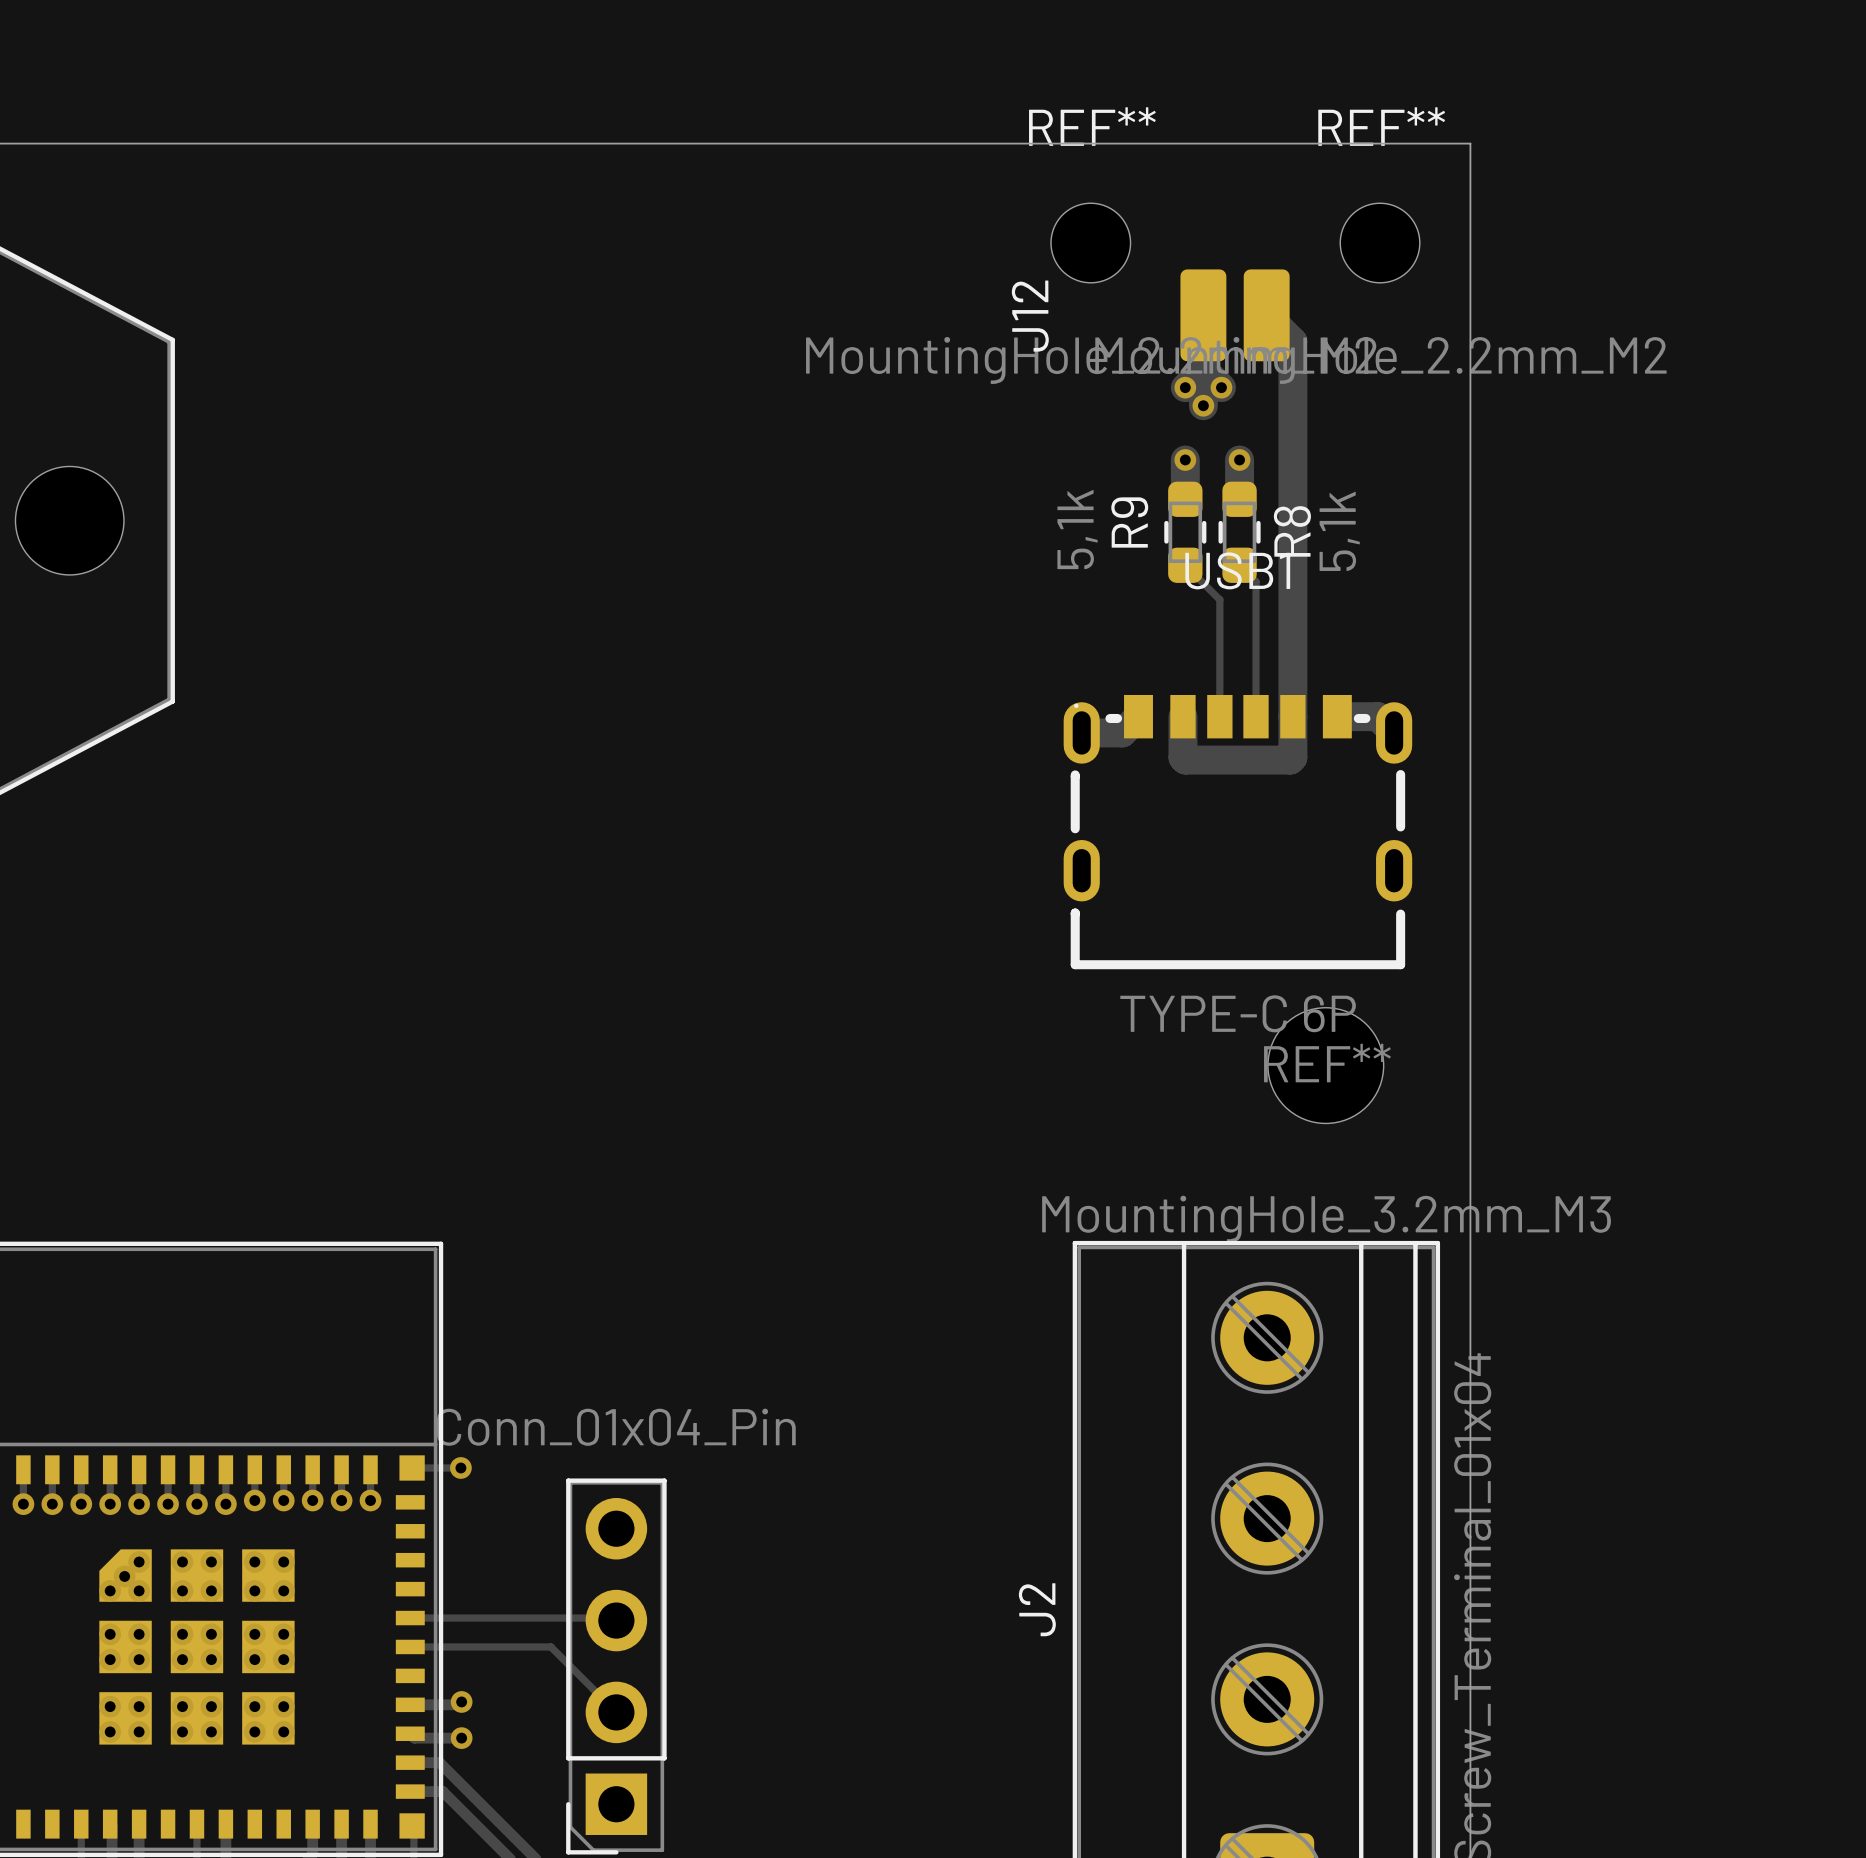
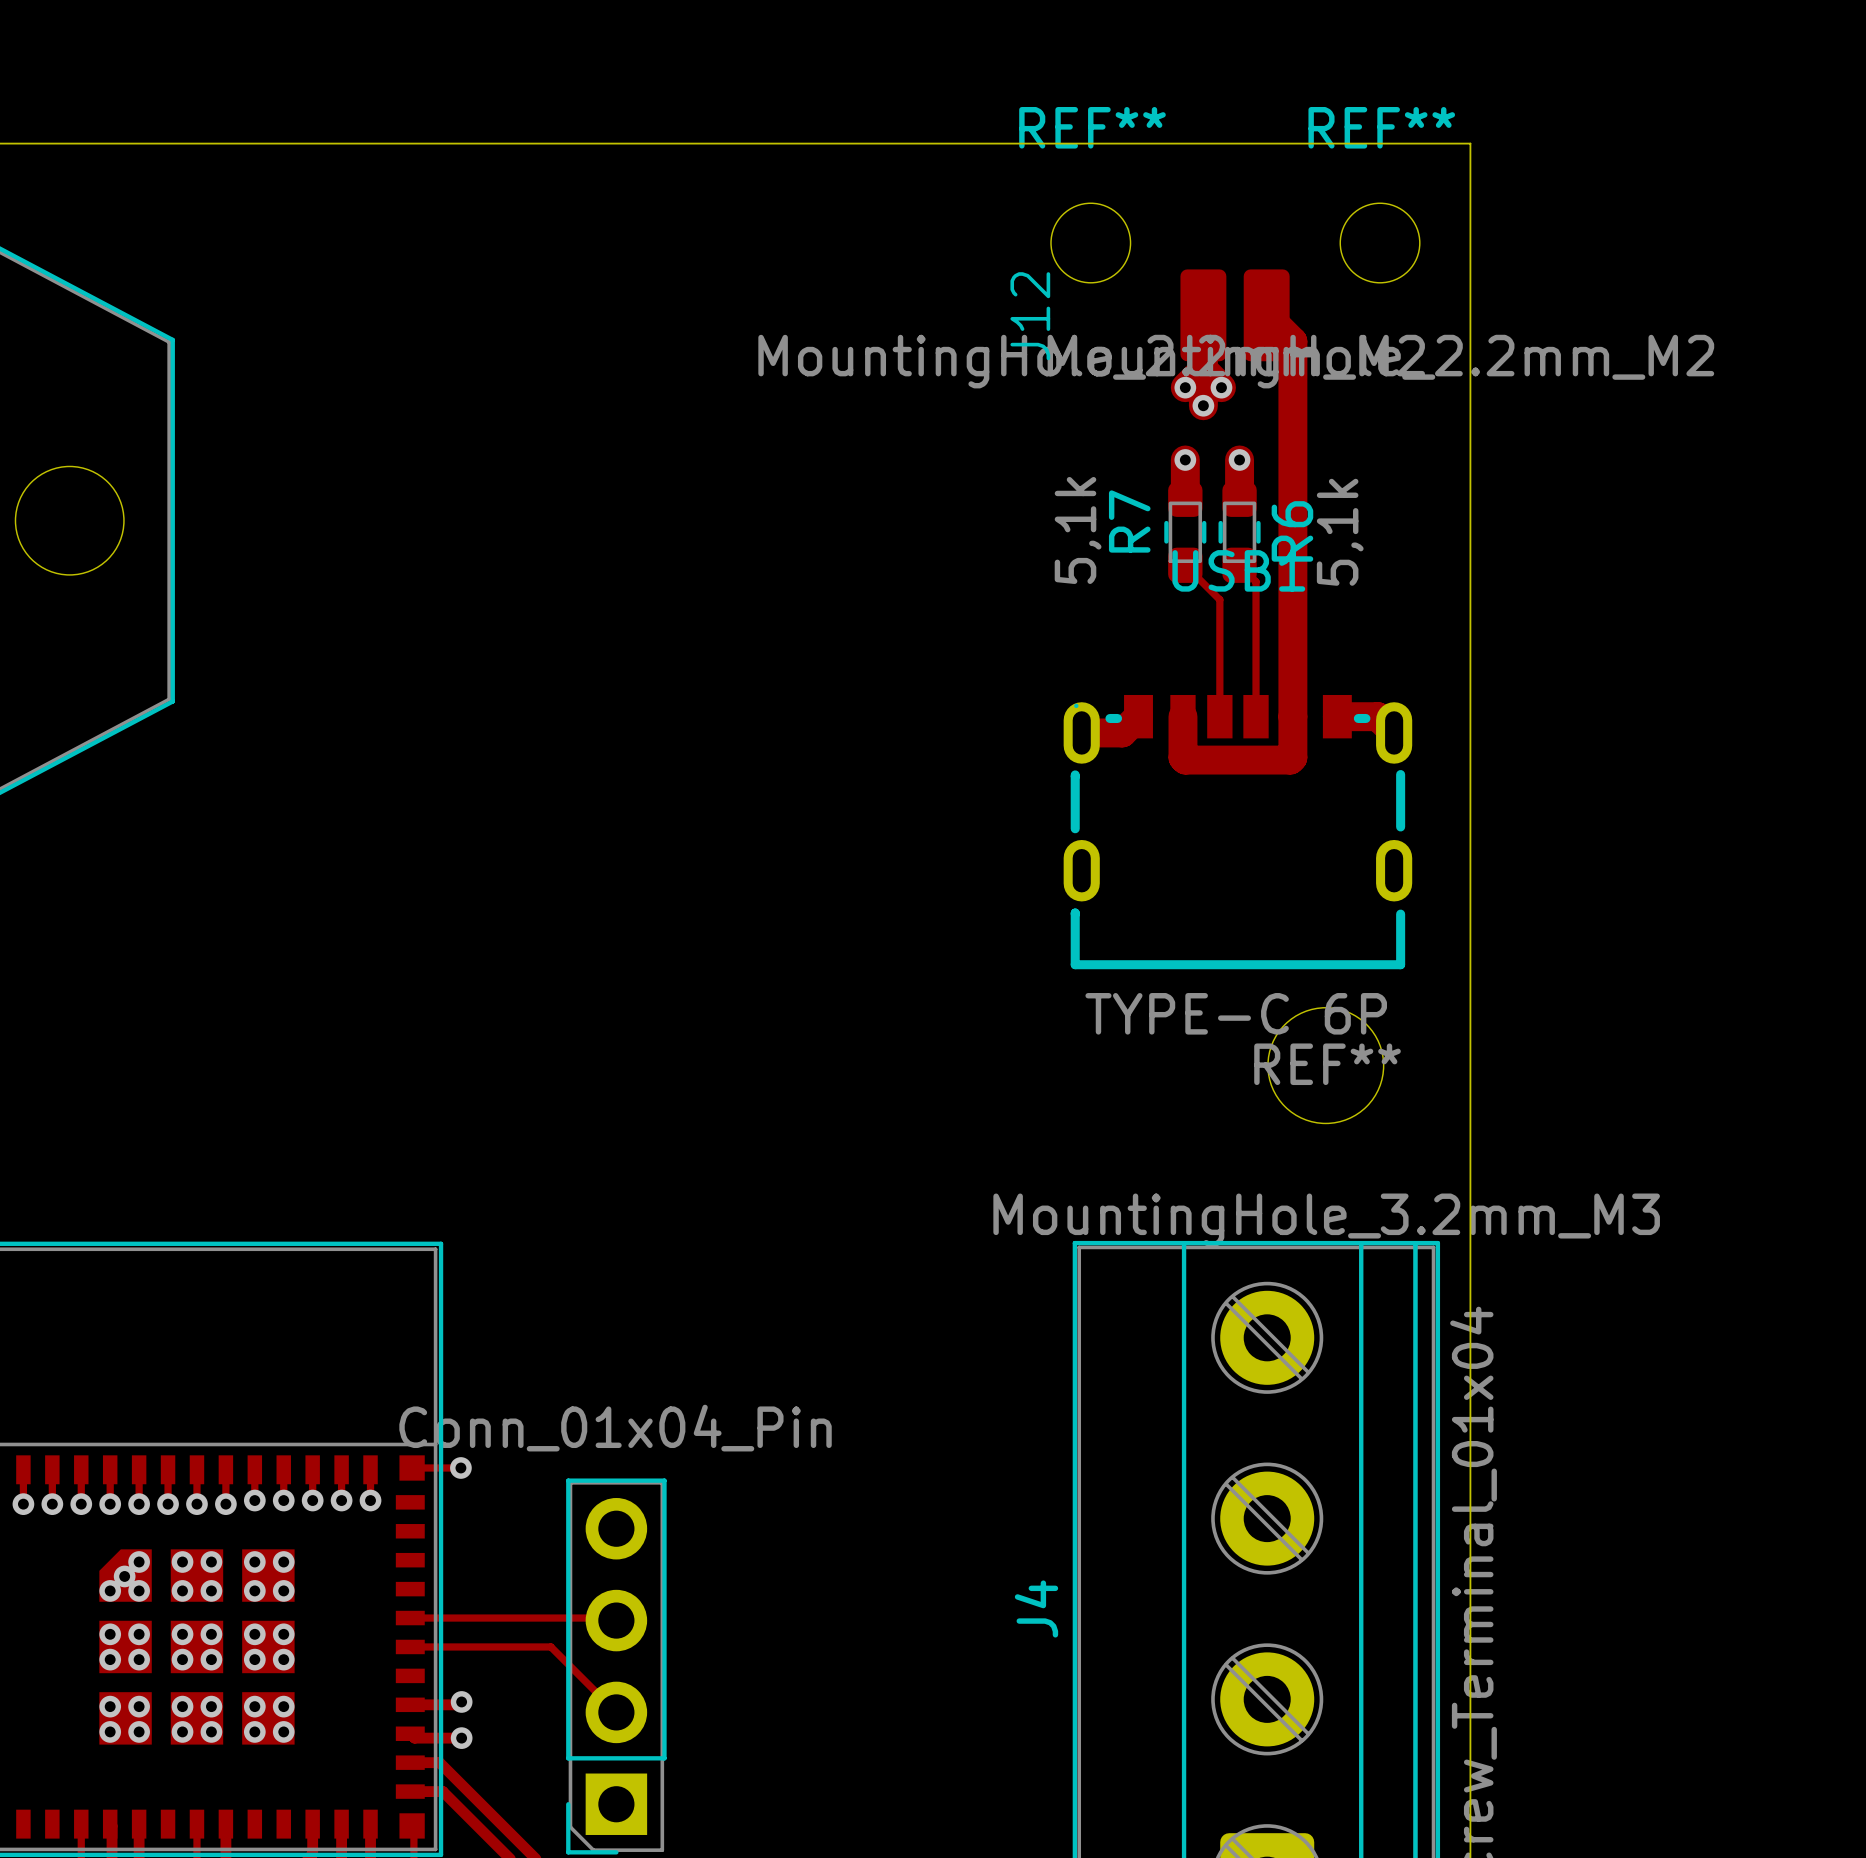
R9 name: R9 (1129, 522) -> R7 (1129, 521)
R8 name: R8 (1292, 531) -> R6 (1292, 531)
J2 name: J2 (1037, 1609) -> J4 (1036, 1609)

